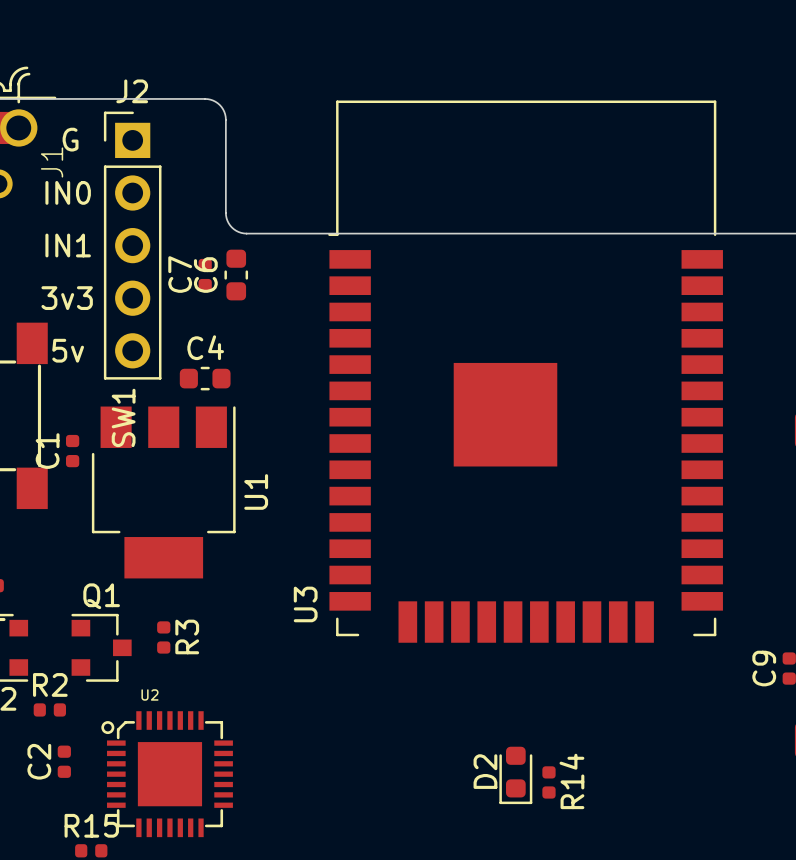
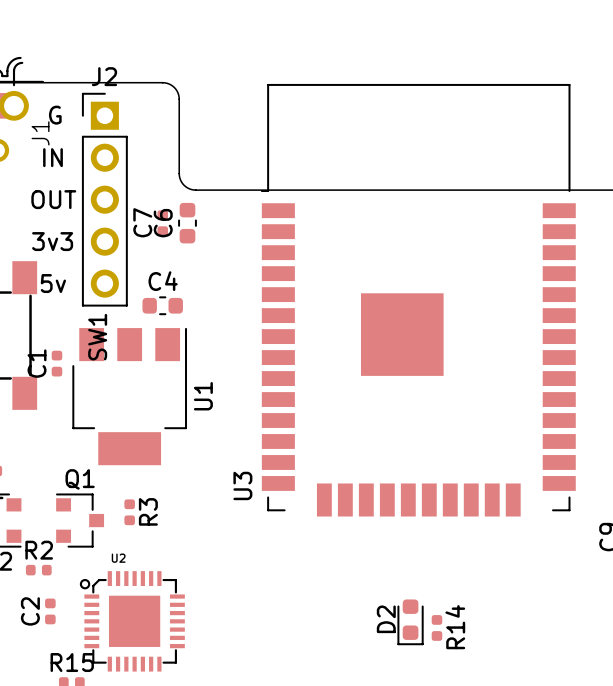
text: IN0 (68, 192) -> IN (53, 157)
text: IN1 (68, 245) -> OUT (53, 199)

